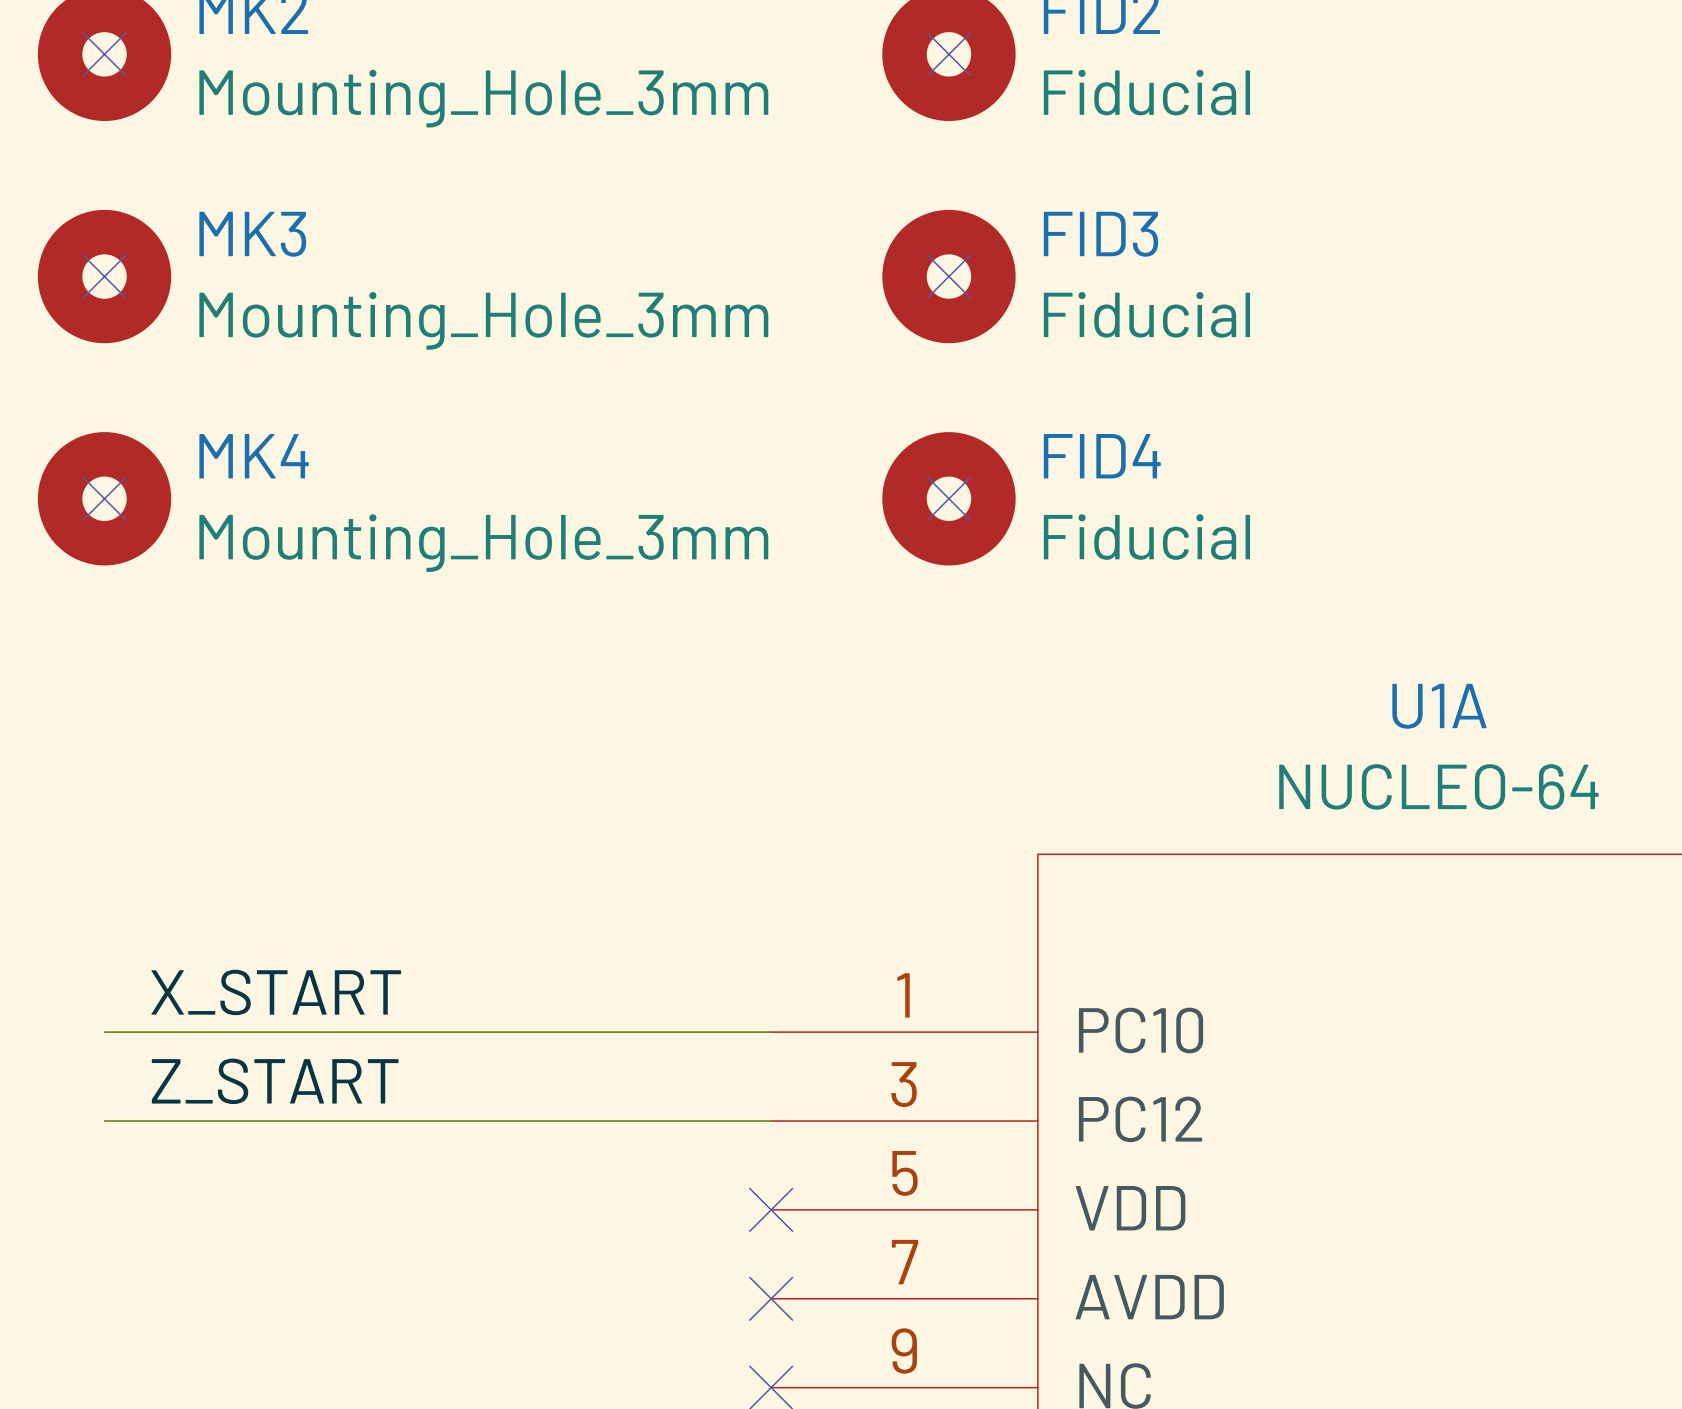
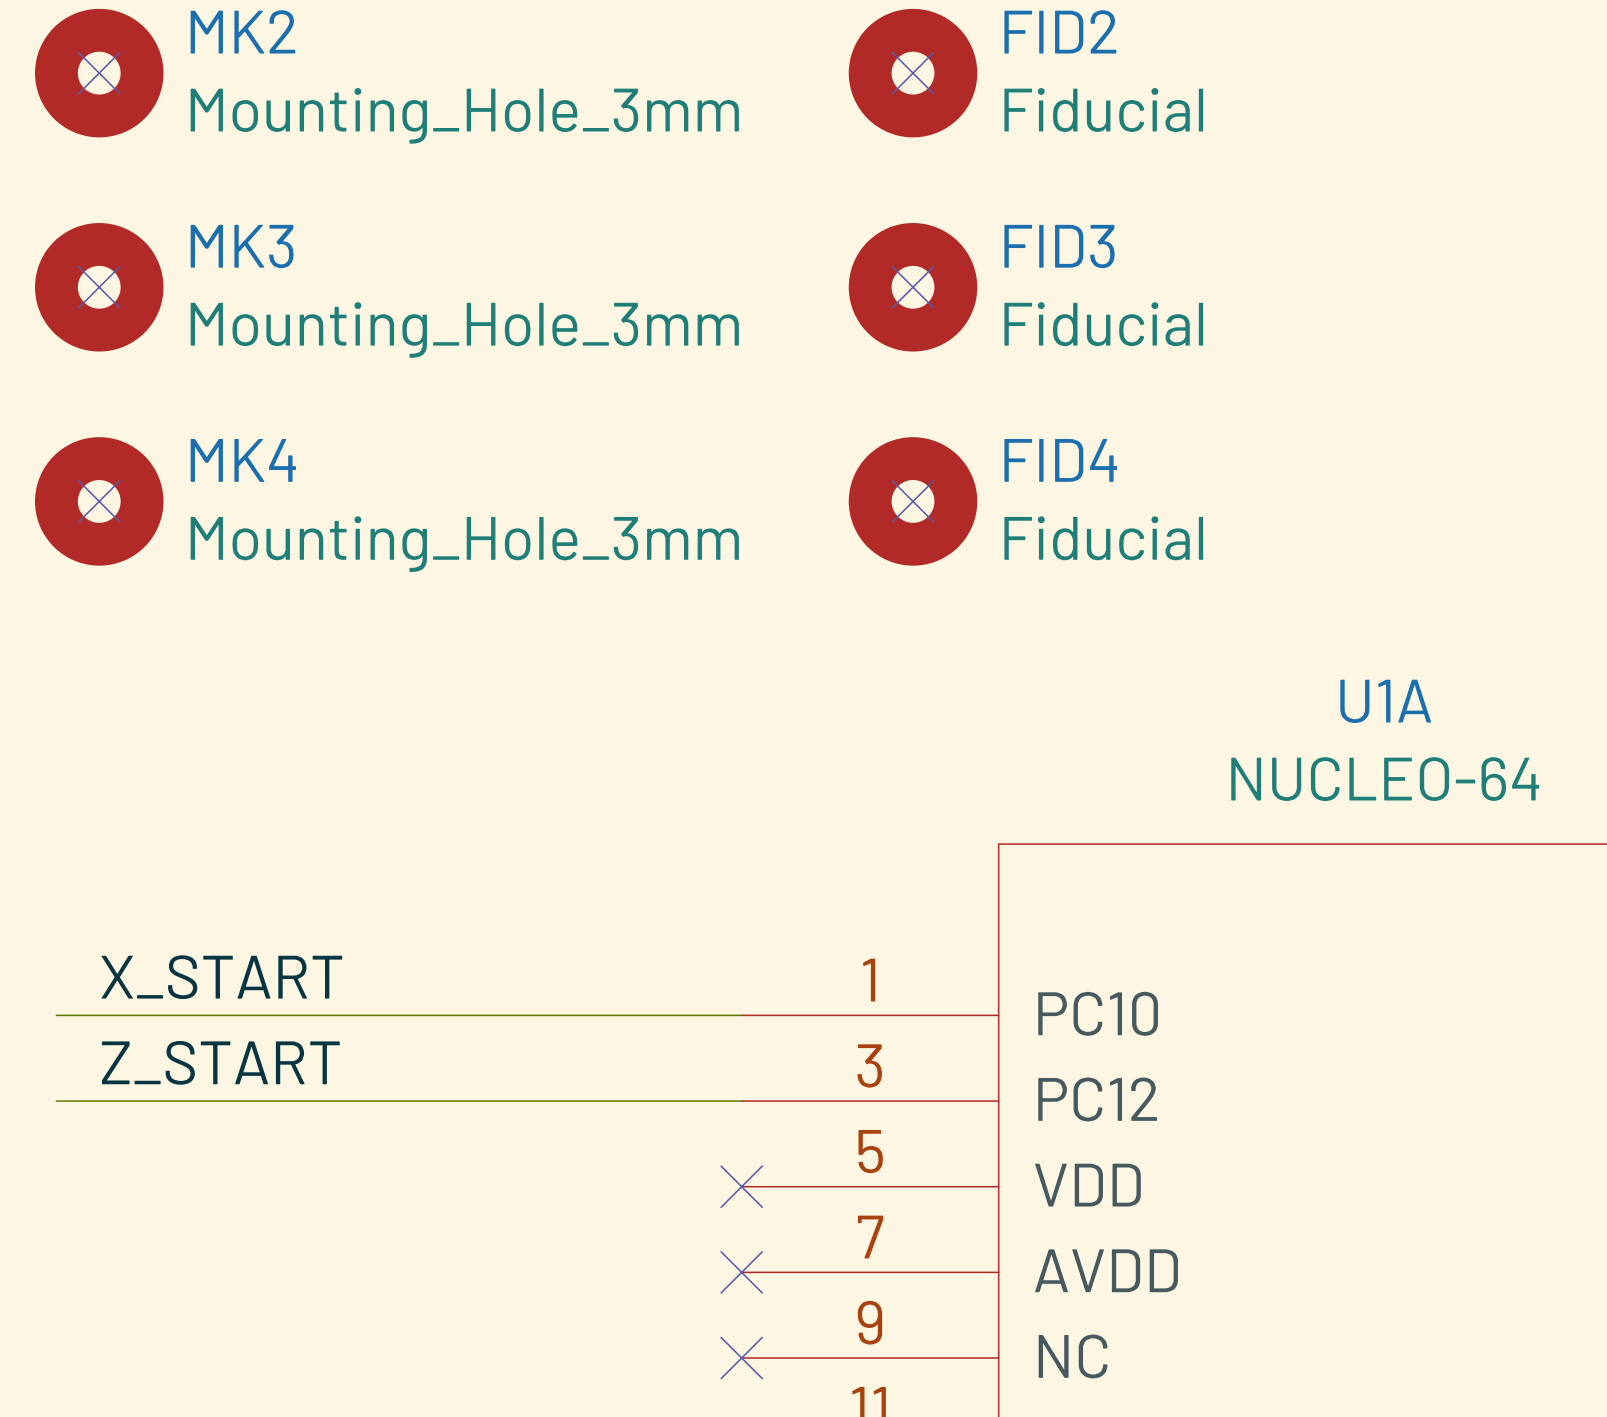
label position: X_START (276, 992) -> X_START (221, 977)
wire: none -> (56, 1015) (99, 1015)
label position: Z_START (275, 1081) -> Z_START (220, 1062)
wire: none -> (56, 1101) (99, 1101)

